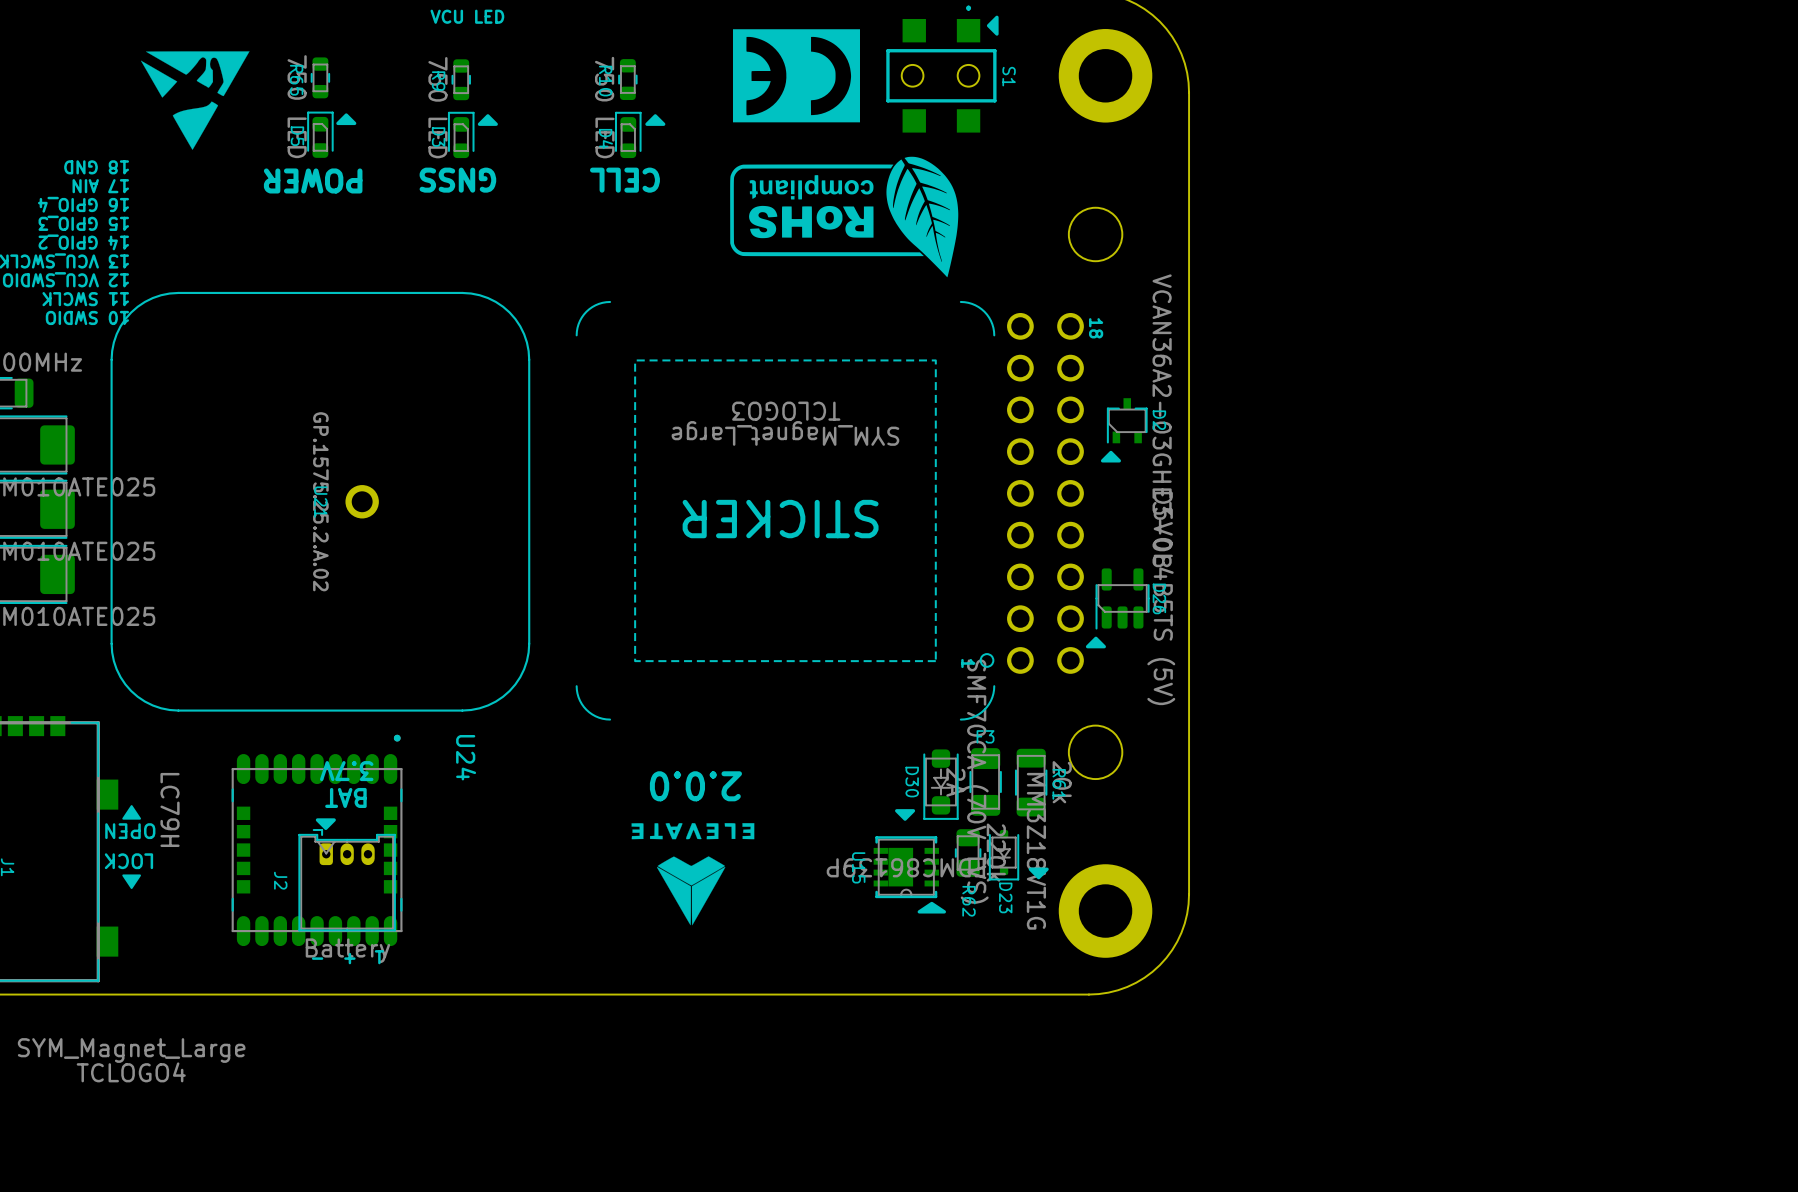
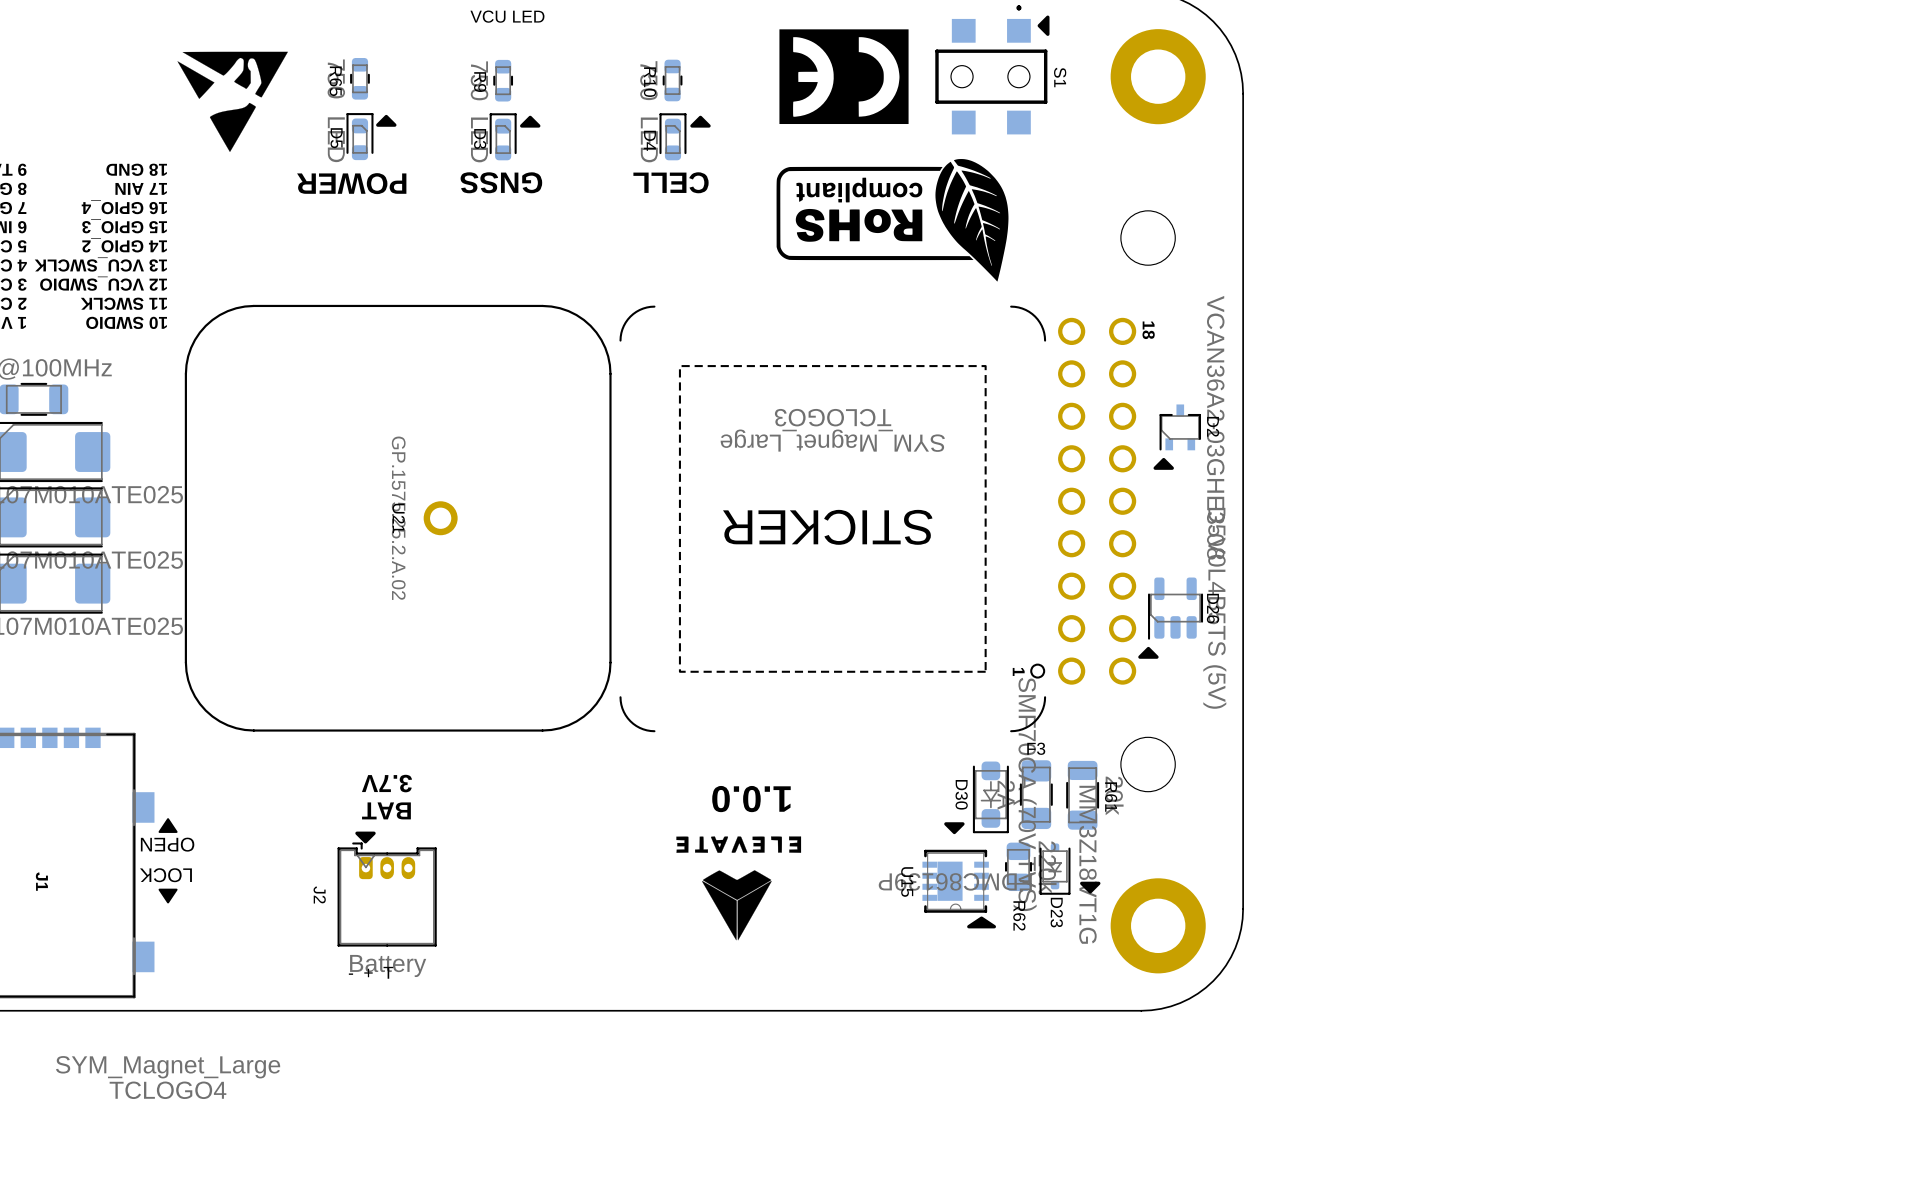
U21 position: (320, 501) -> (398, 518)
text: 2.0.0 (695, 786) -> 1.0.0 (751, 799)
U24: LC79H (317, 840) -> none

